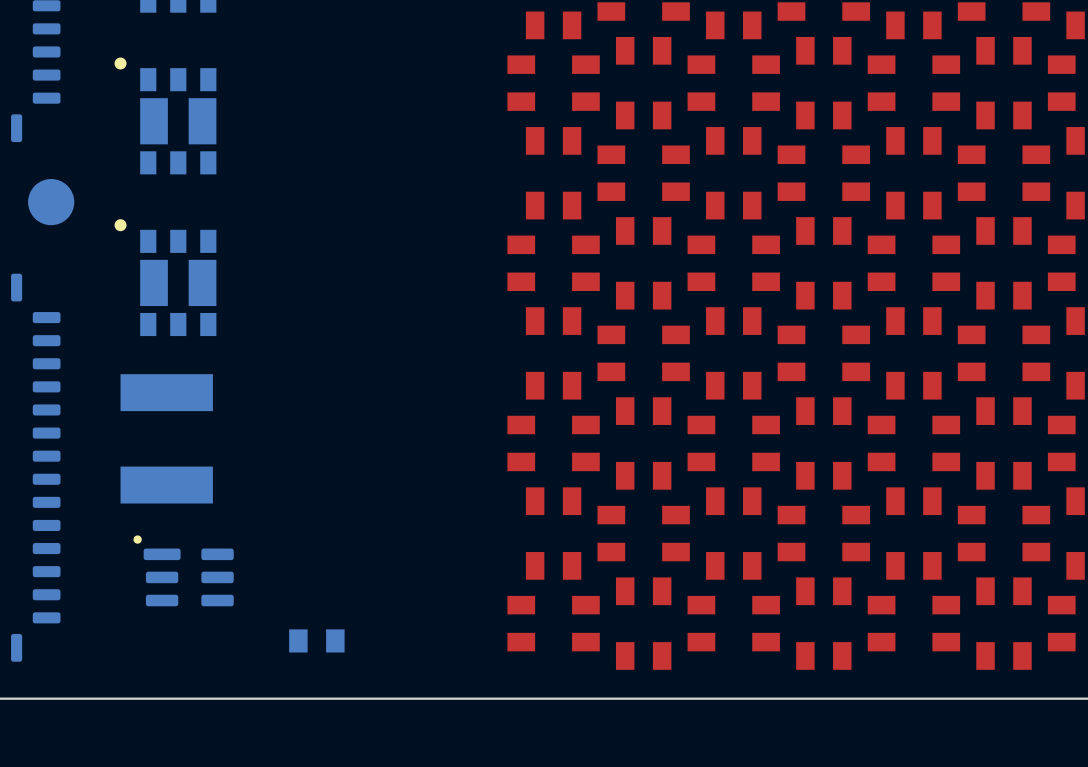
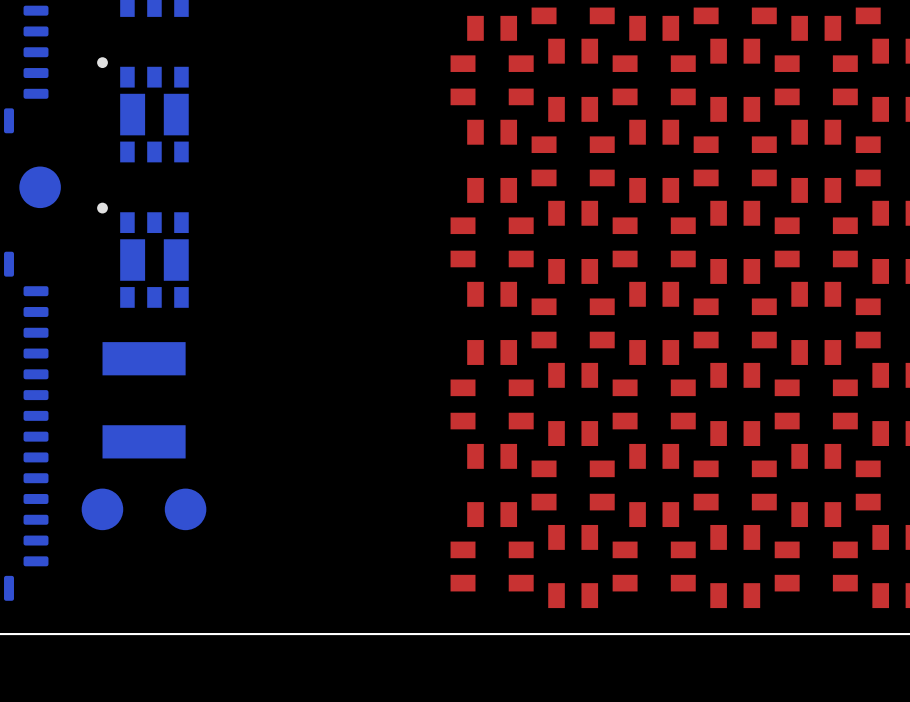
part footprint: [133, 535, 234, 607] -> [164, 488, 207, 531]
part: none -> (102, 509)
part: (316, 640) -> none

